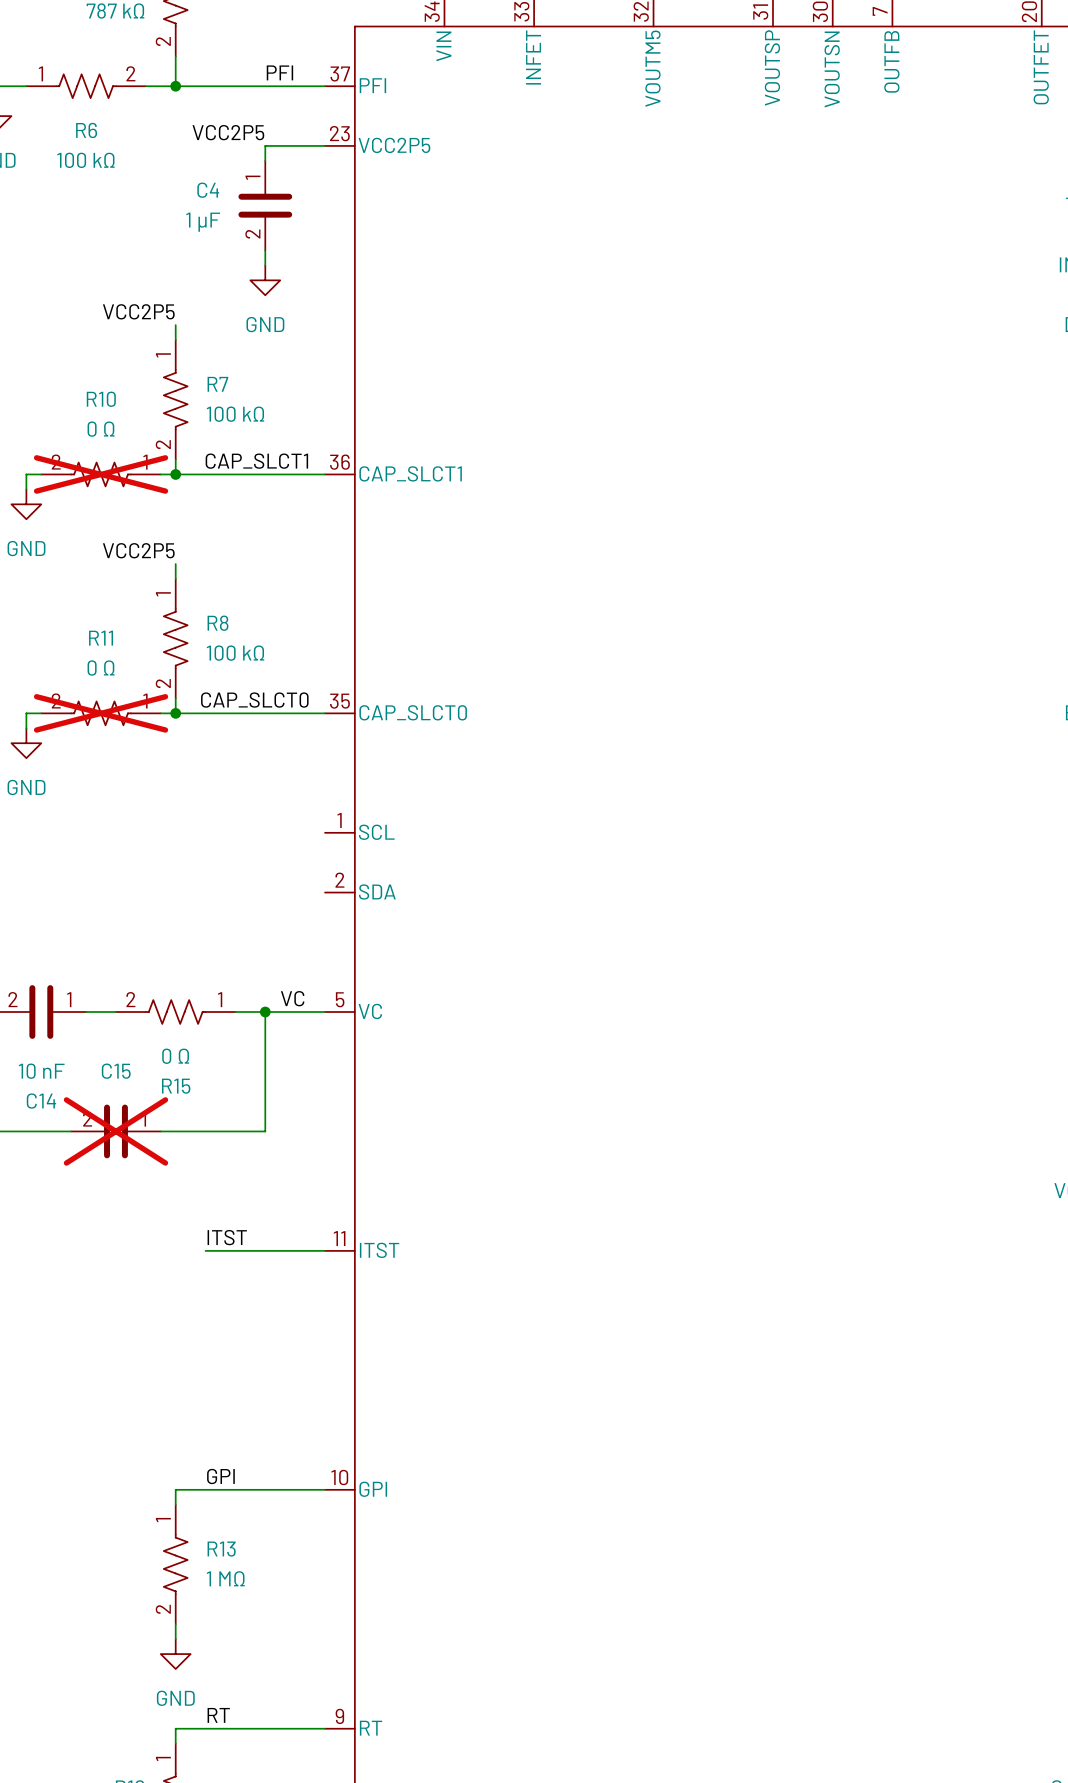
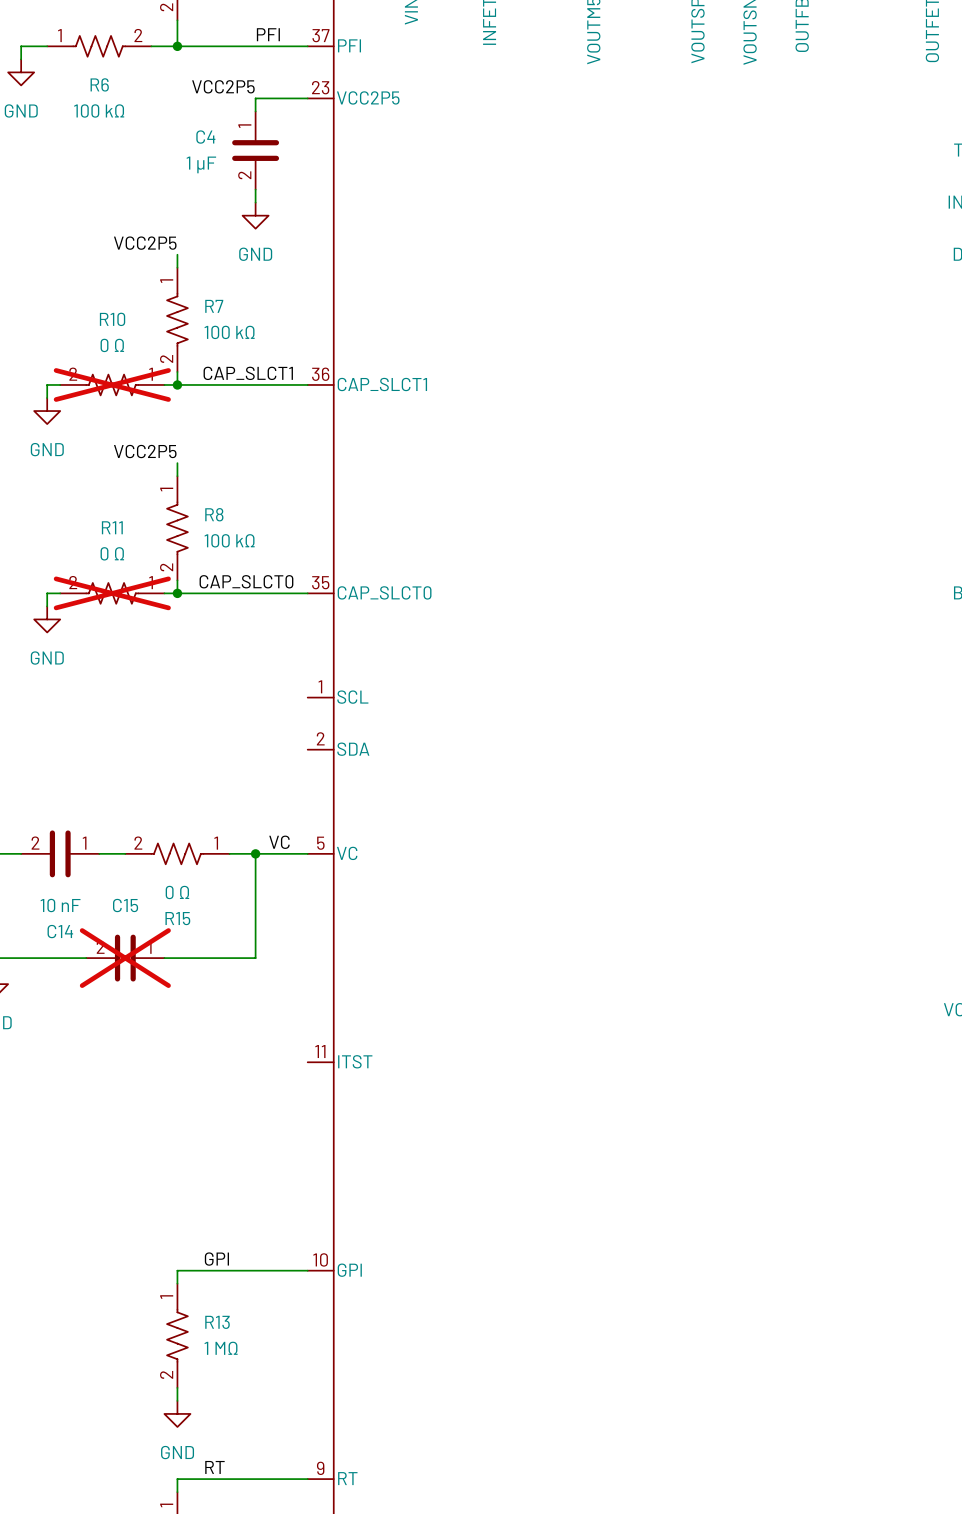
label: ITST (227, 1237) -> none
wire: (205, 1250) (325, 1250) -> none

